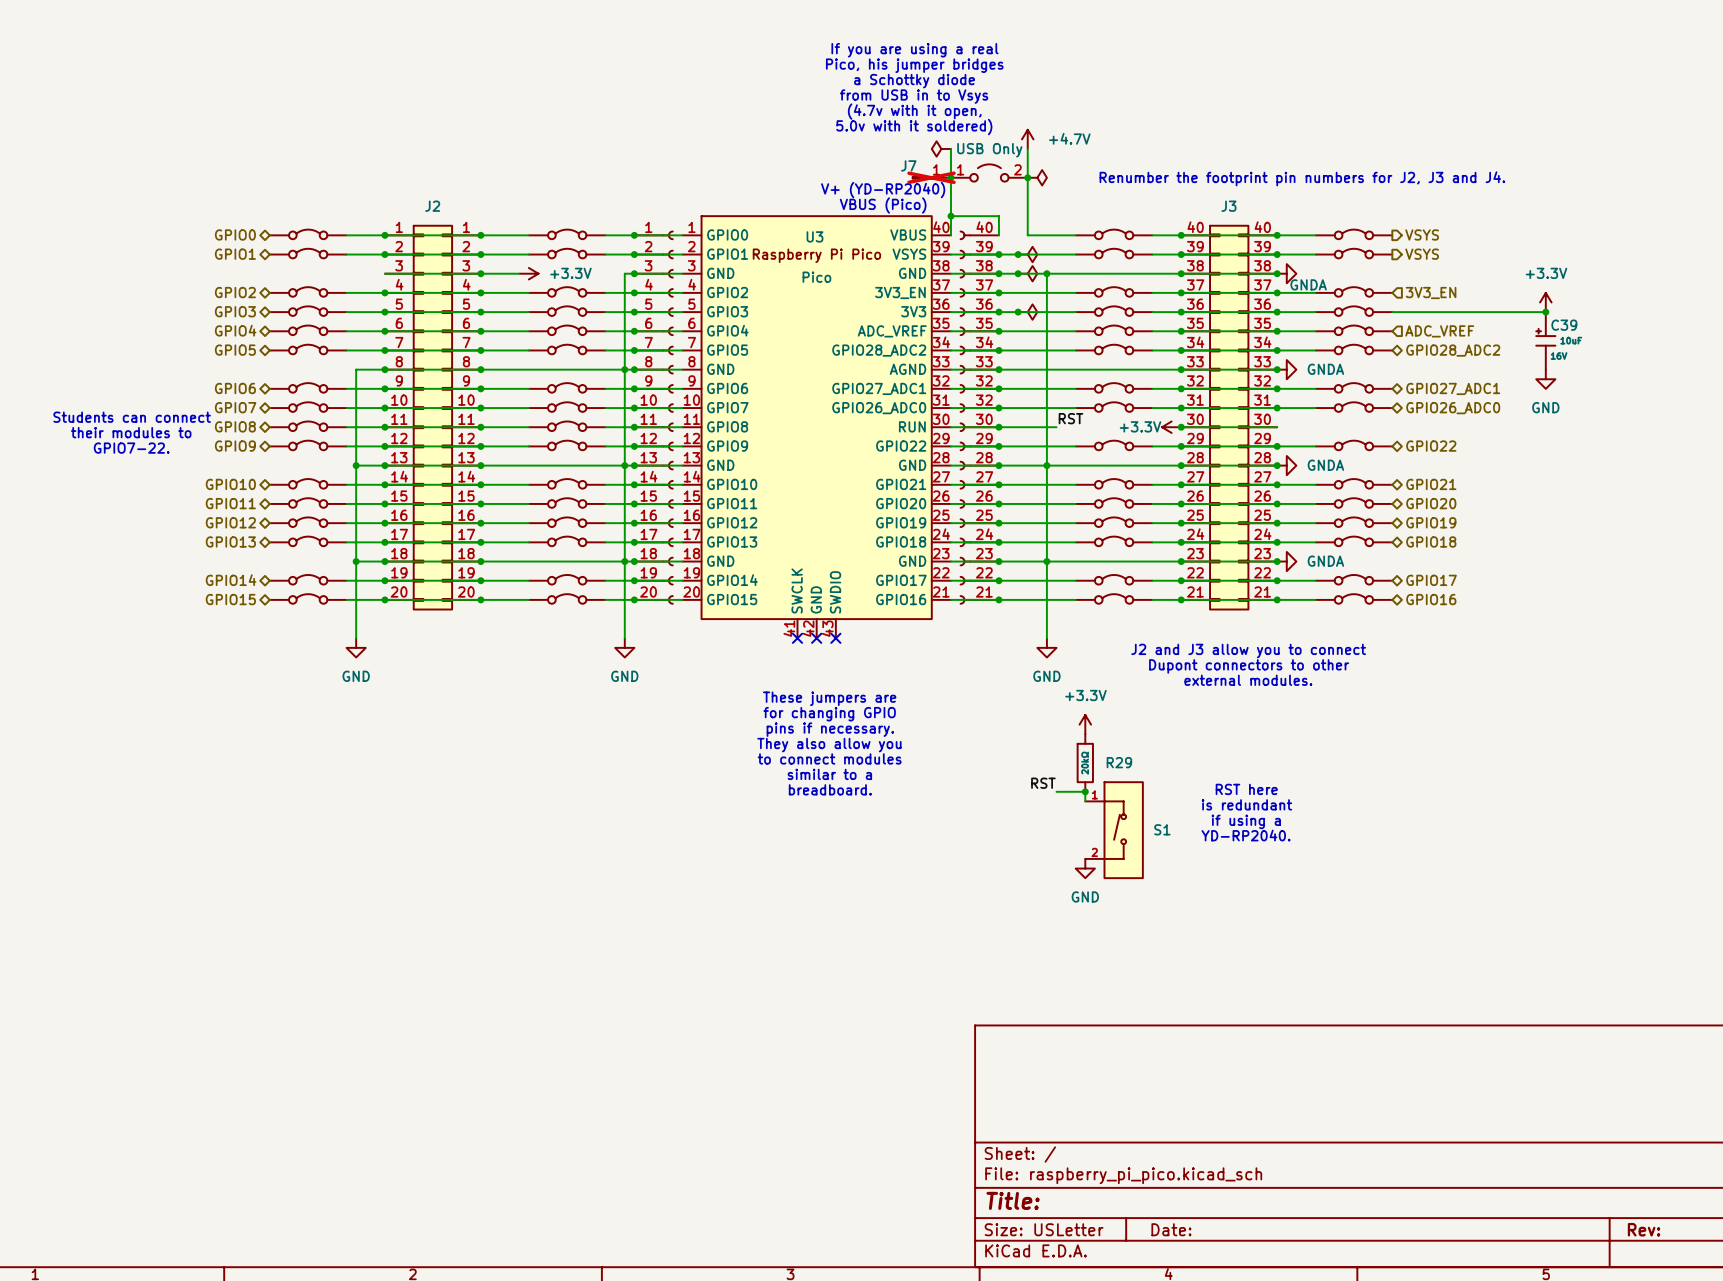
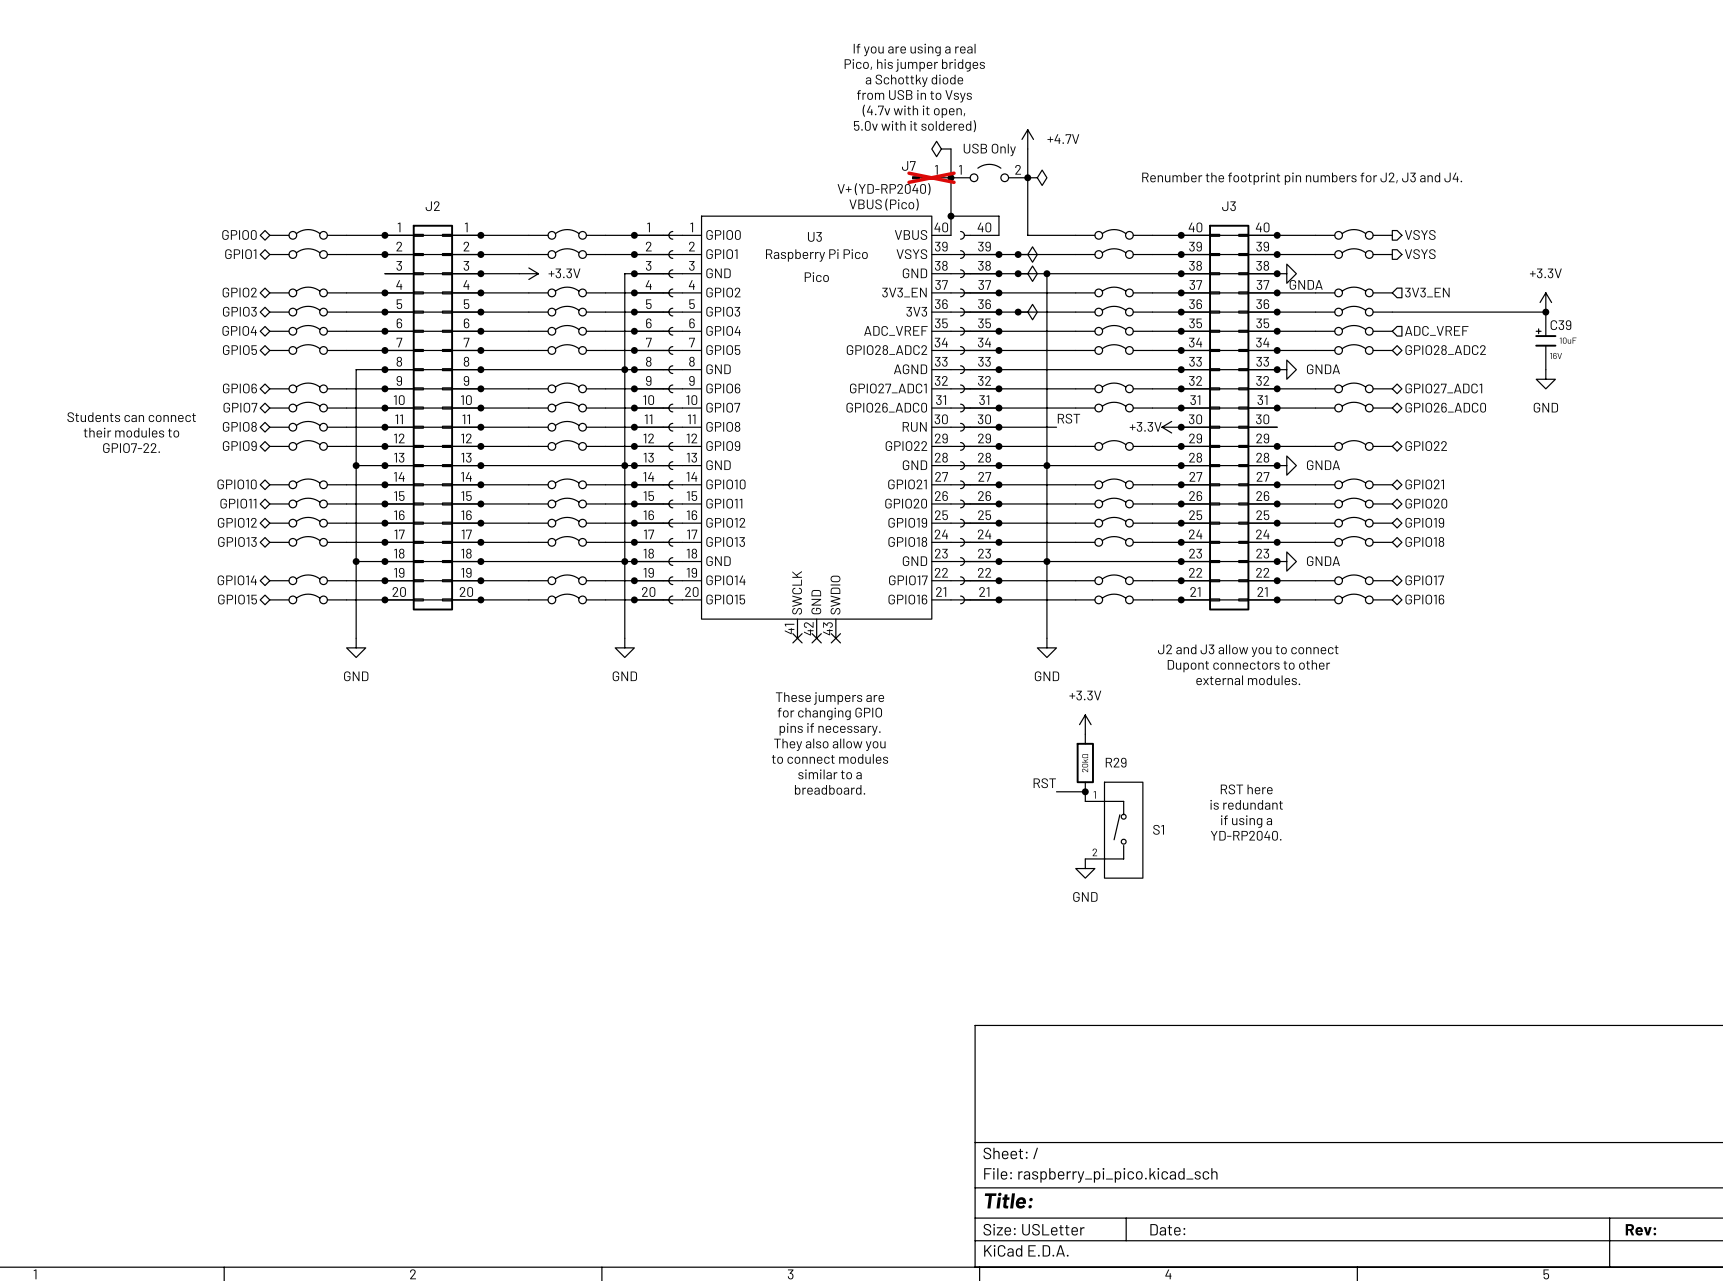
part pin number: 32 (984, 400) -> 31 (984, 400)

